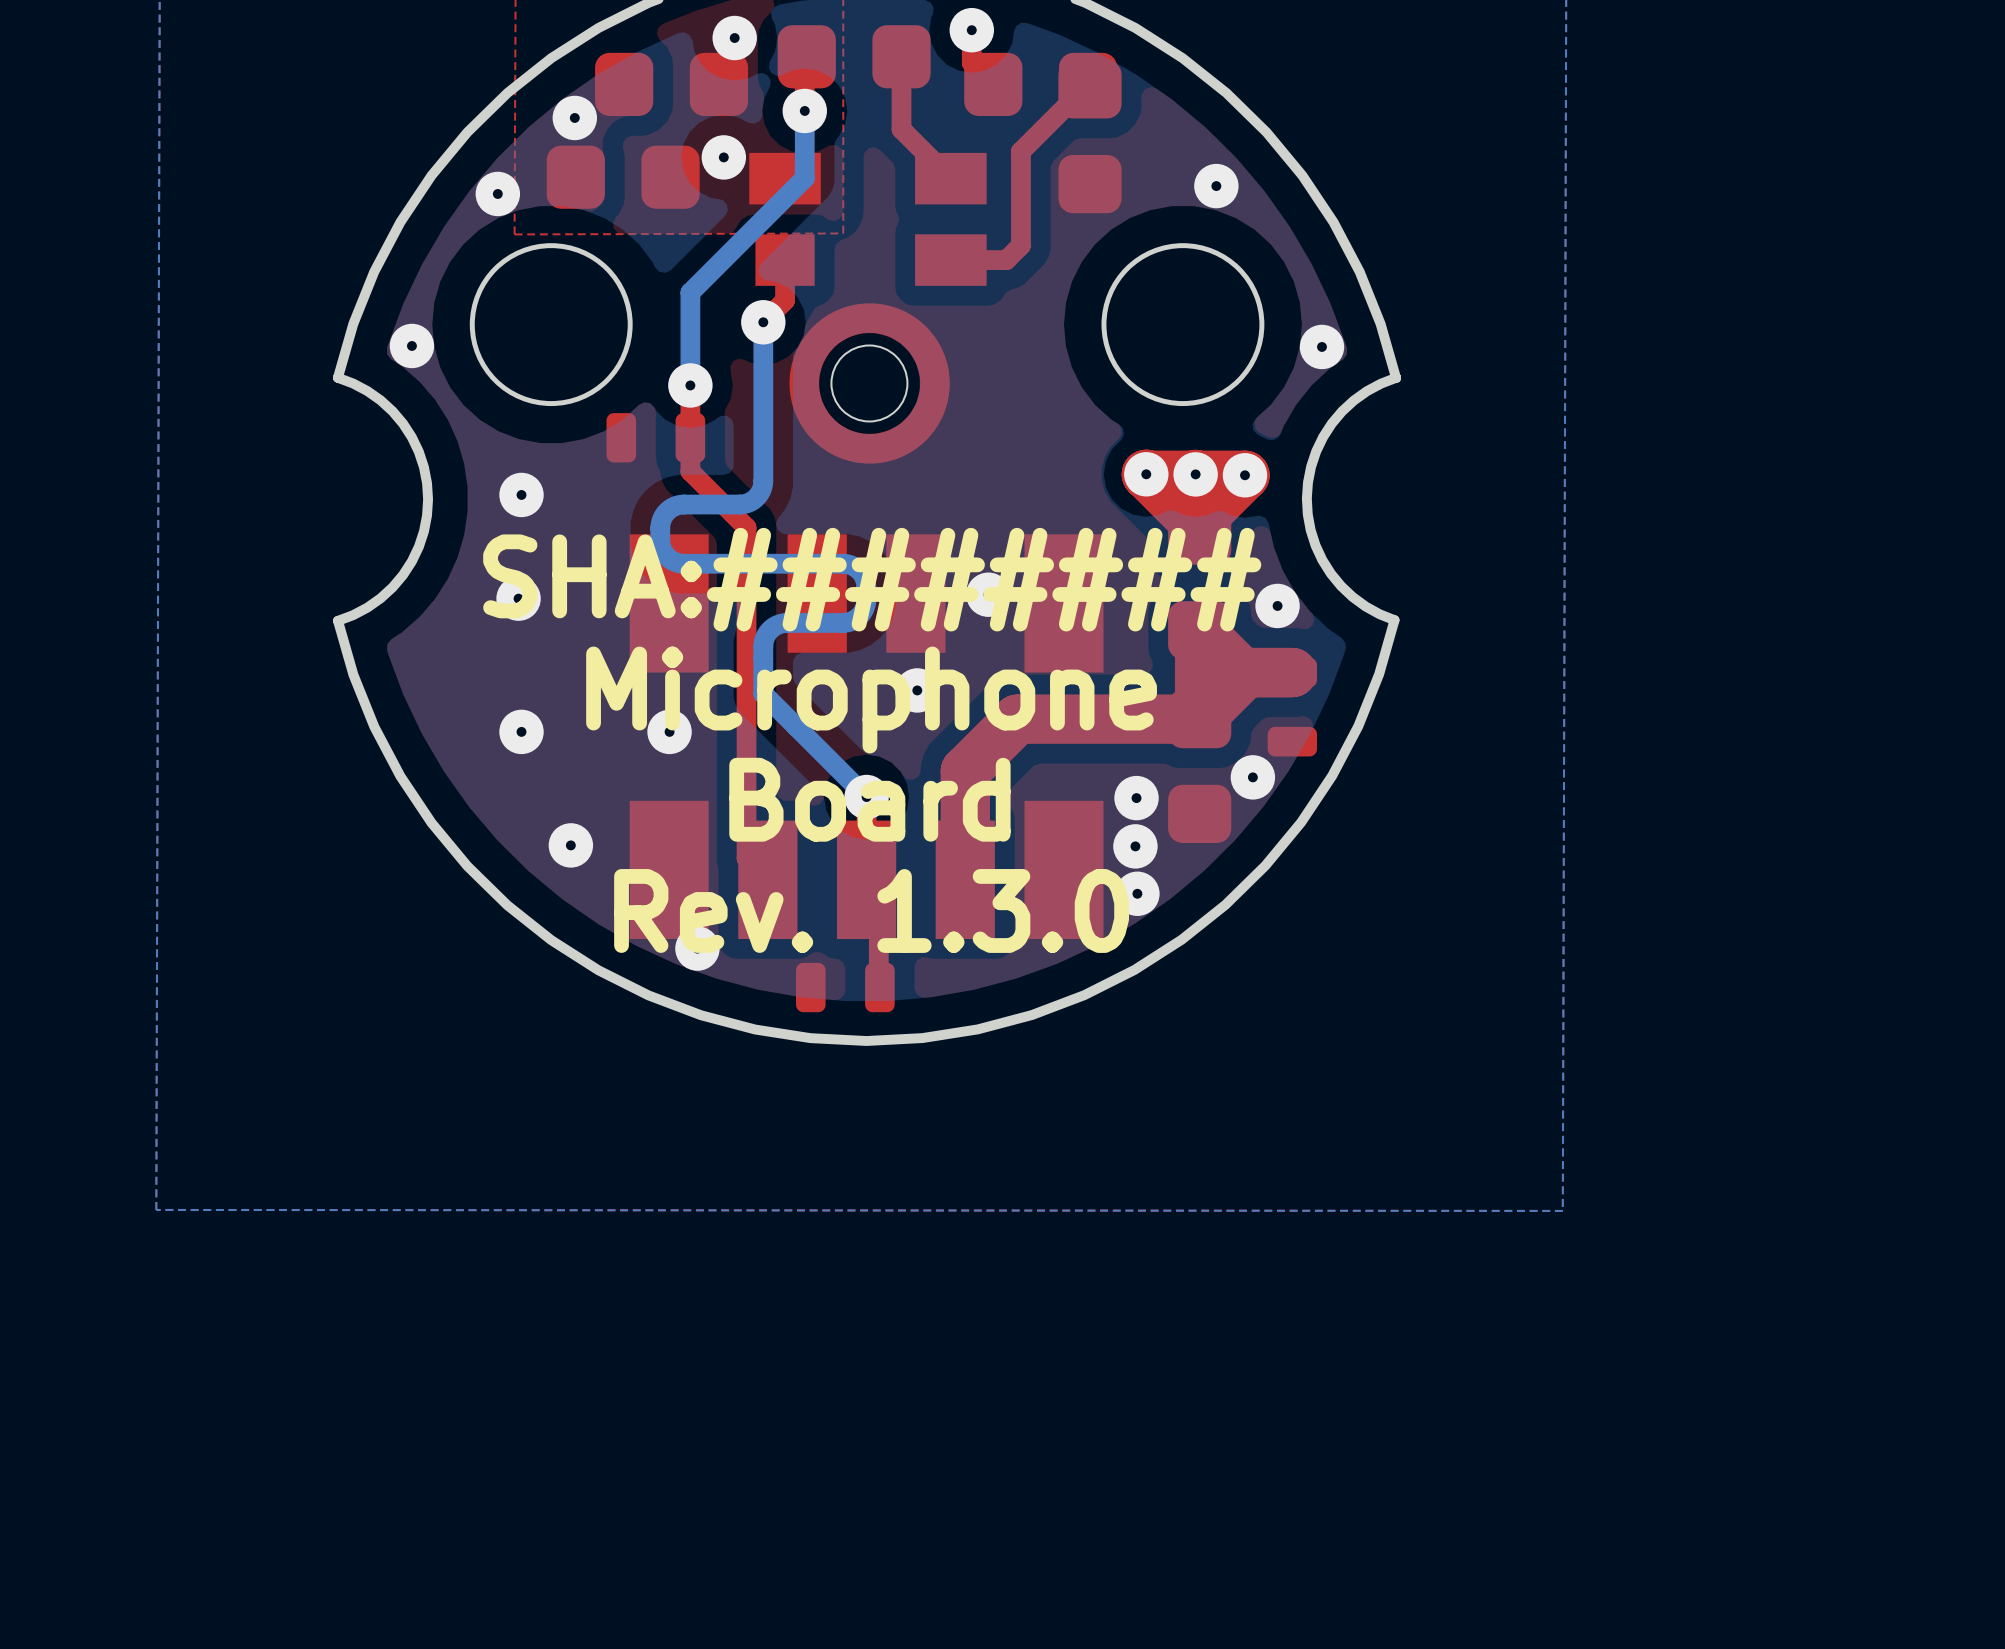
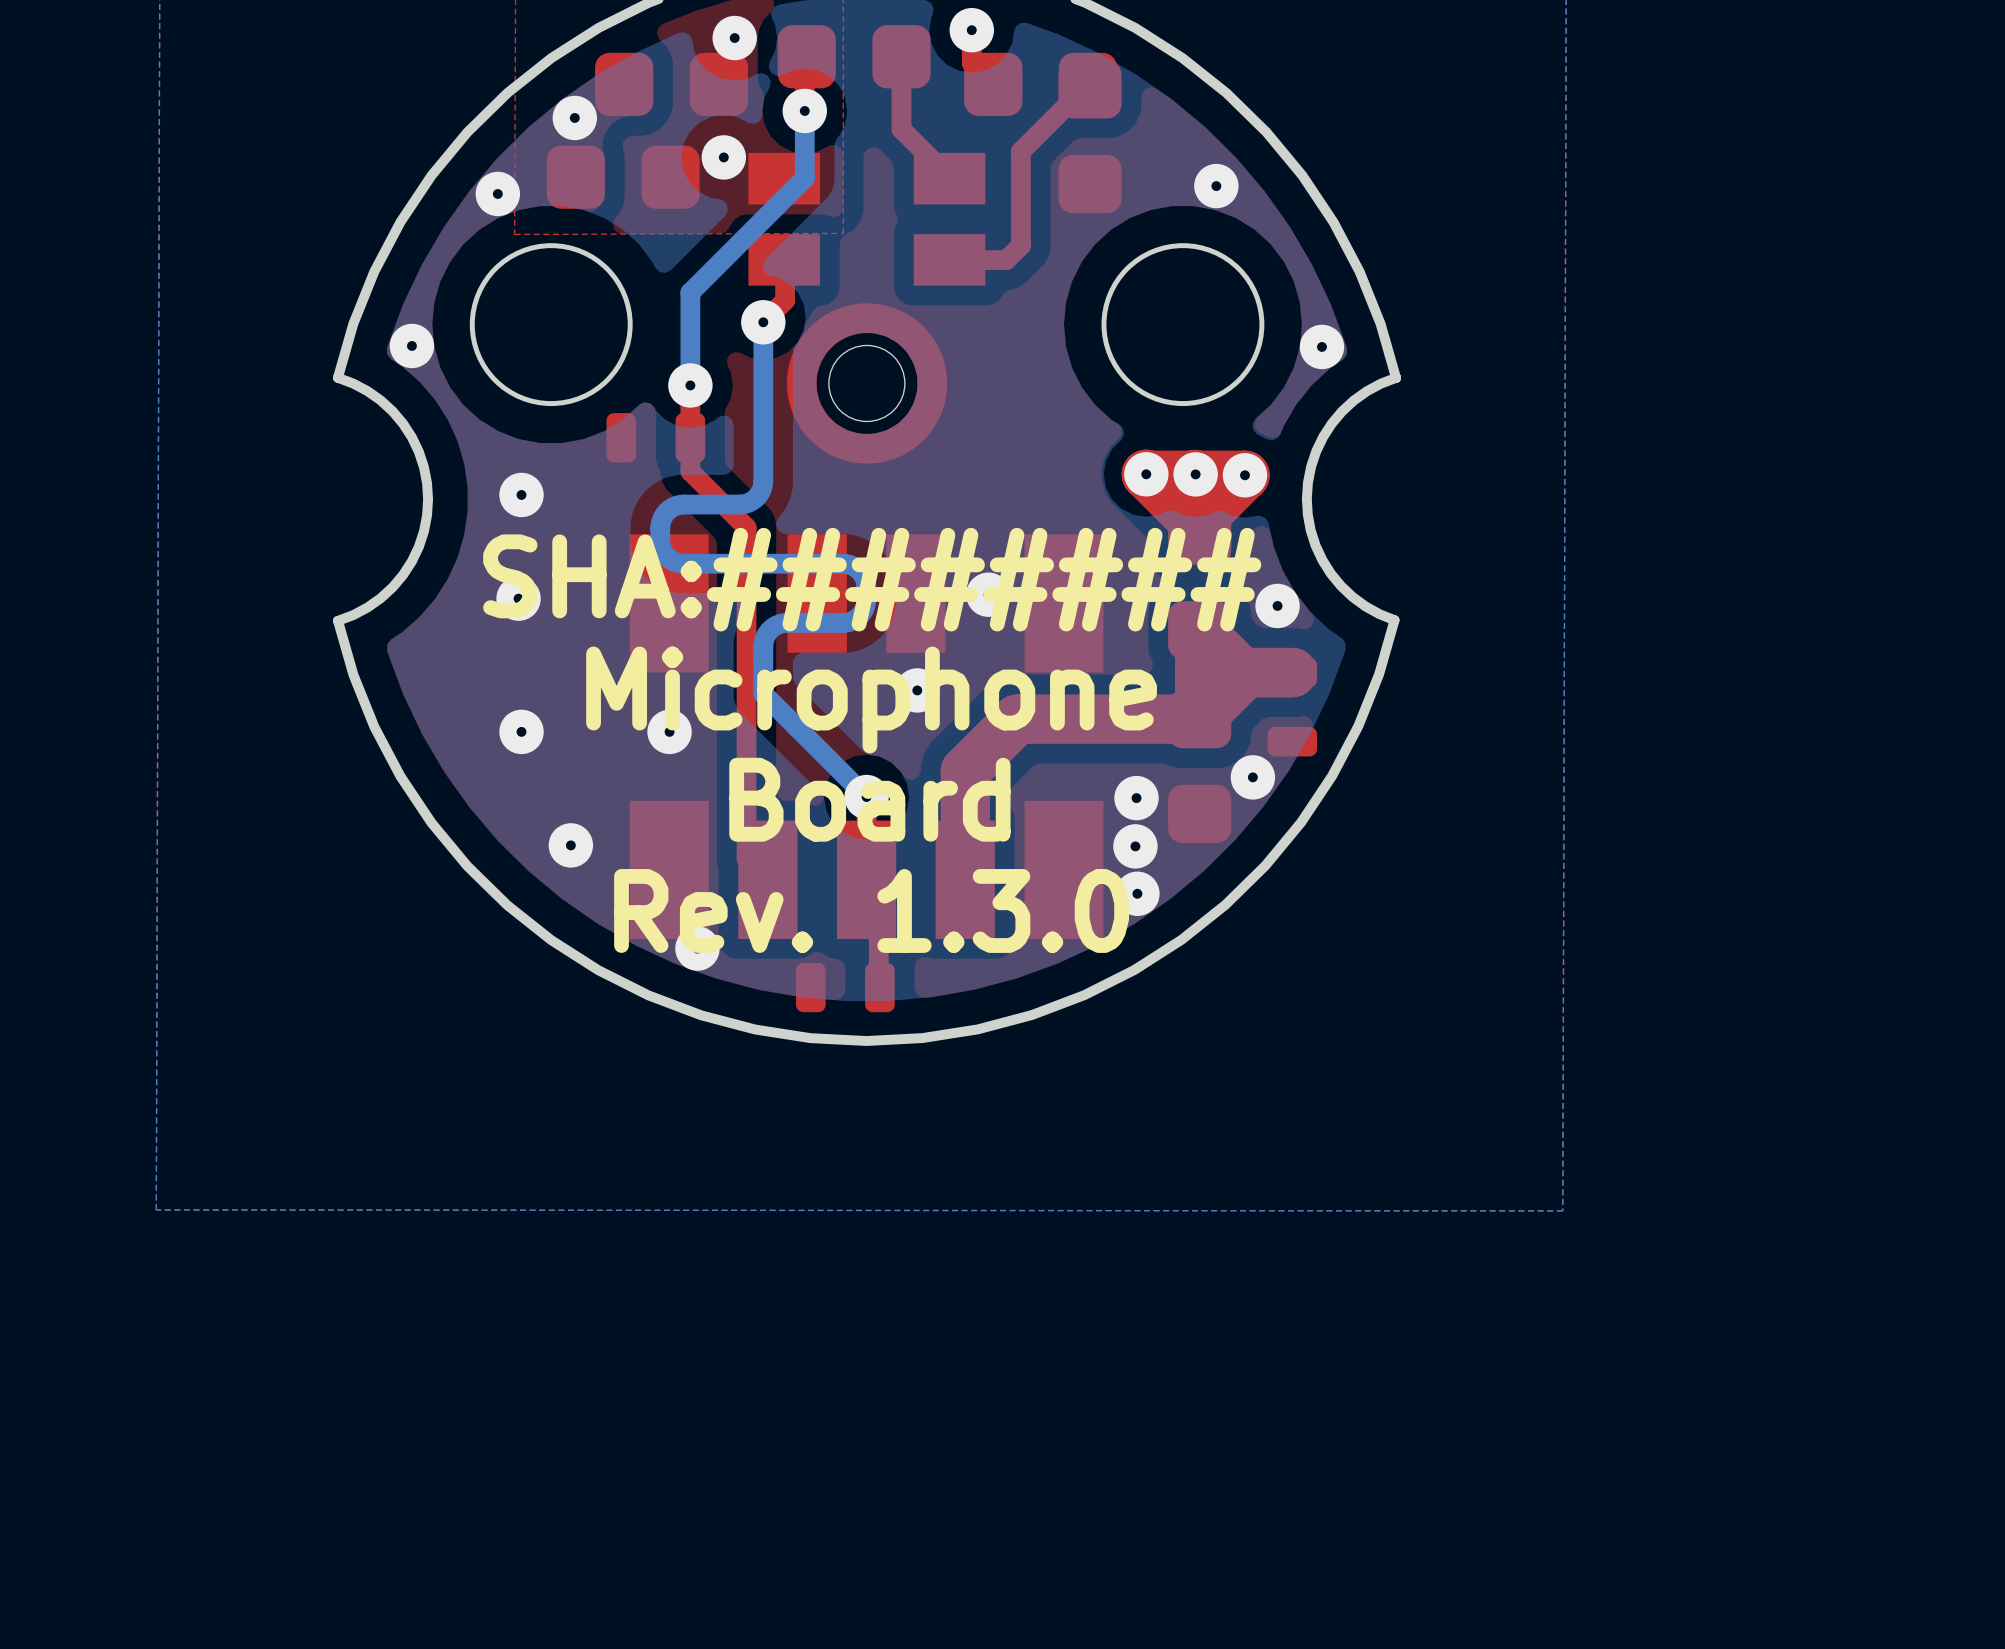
part footprint: [749, 152, 987, 464] -> [748, 152, 986, 464]

